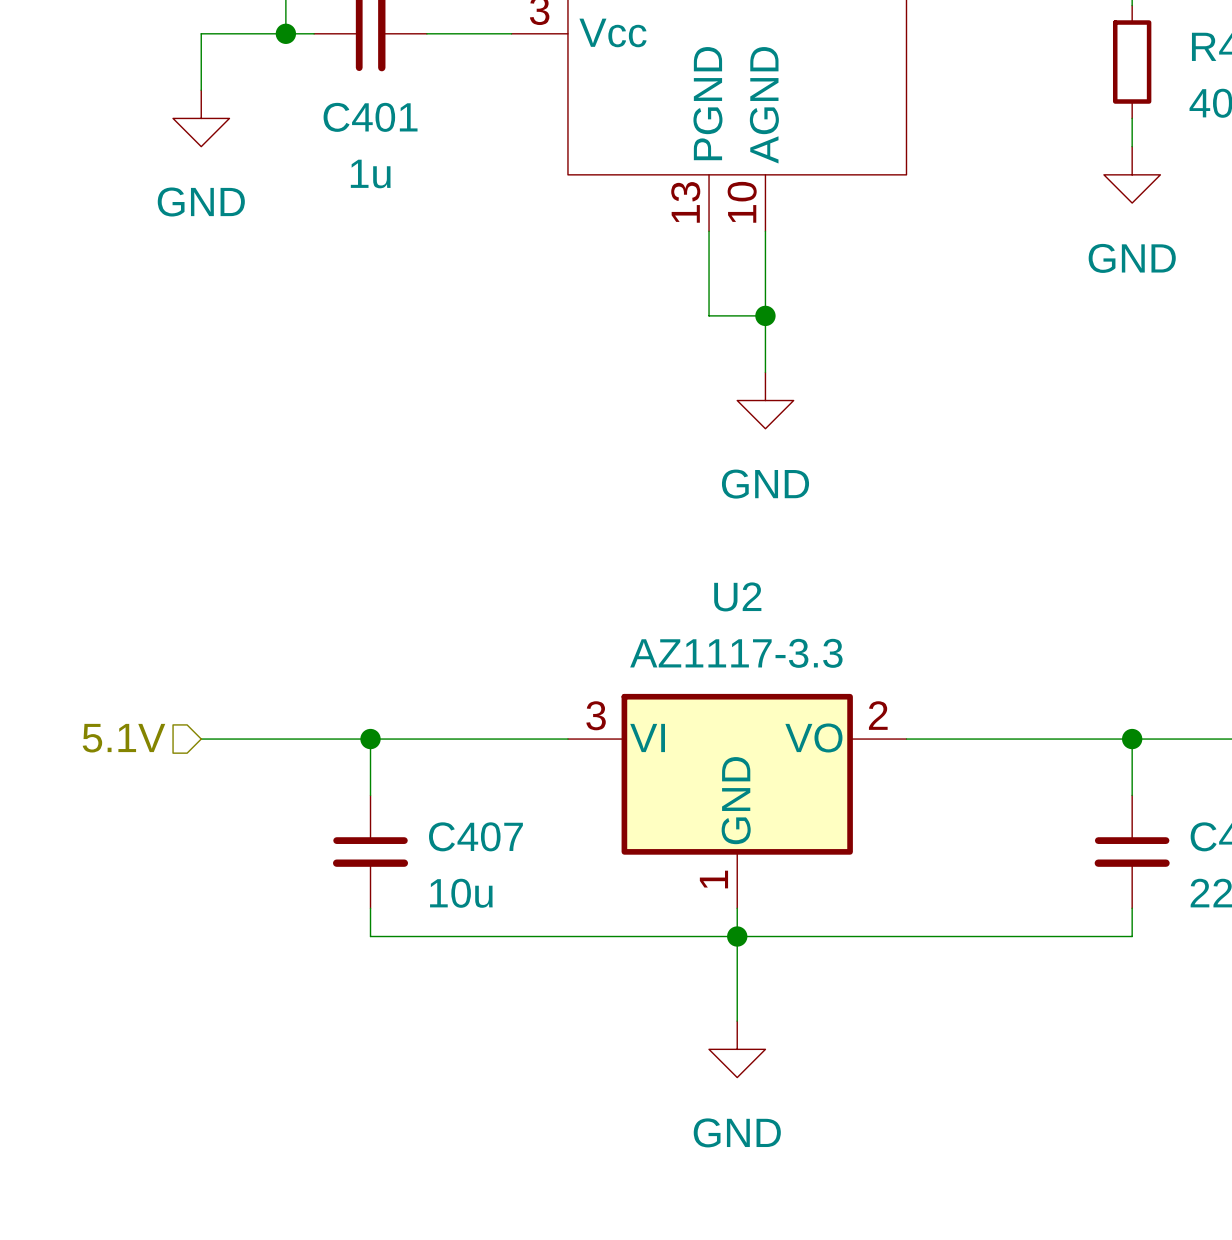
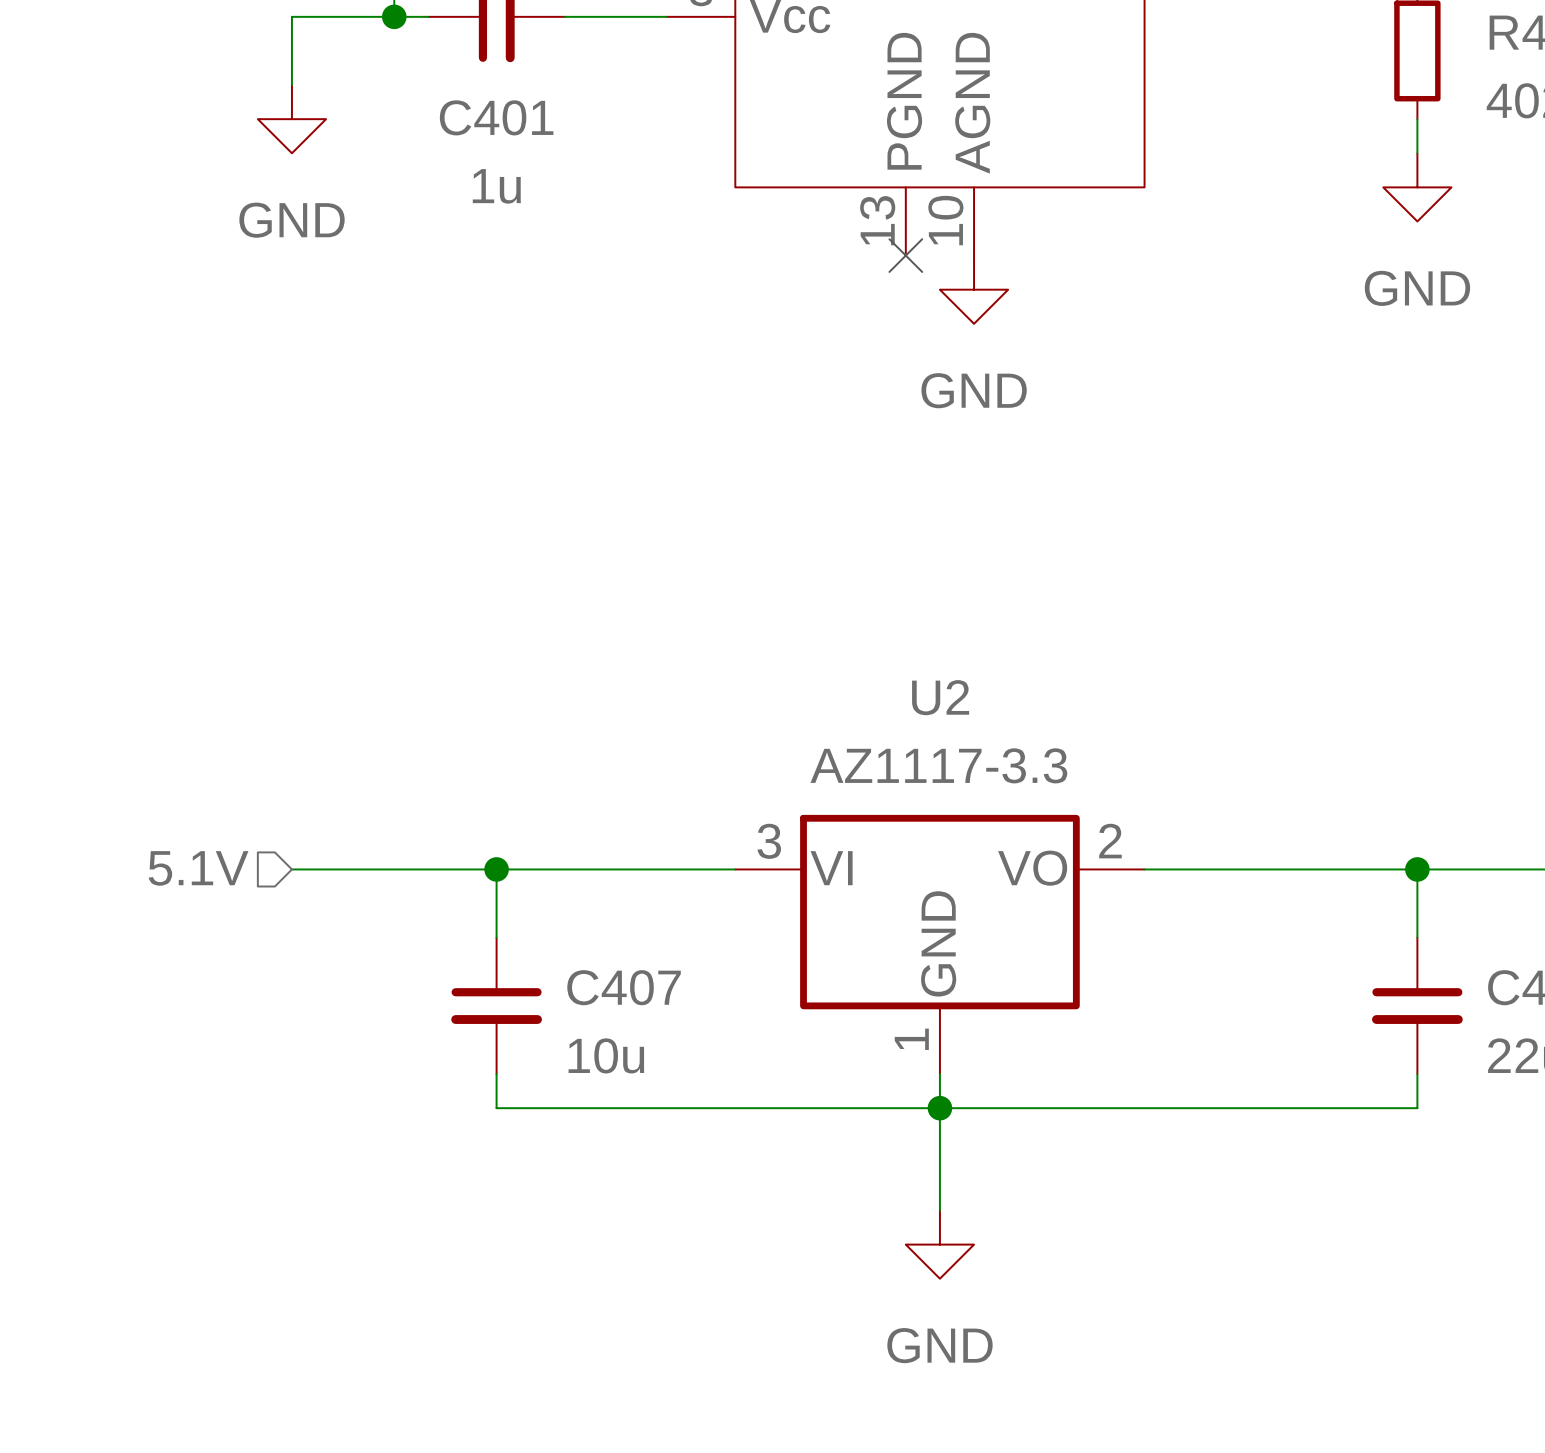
wire: (709, 231) (709, 315) (765, 315) -> none
no-connect mark: none -> (905, 255)
wire: (765, 231) (765, 372) -> none
junction: (765, 315) -> none
power symbol position: GND (765, 400) -> GND (974, 289)

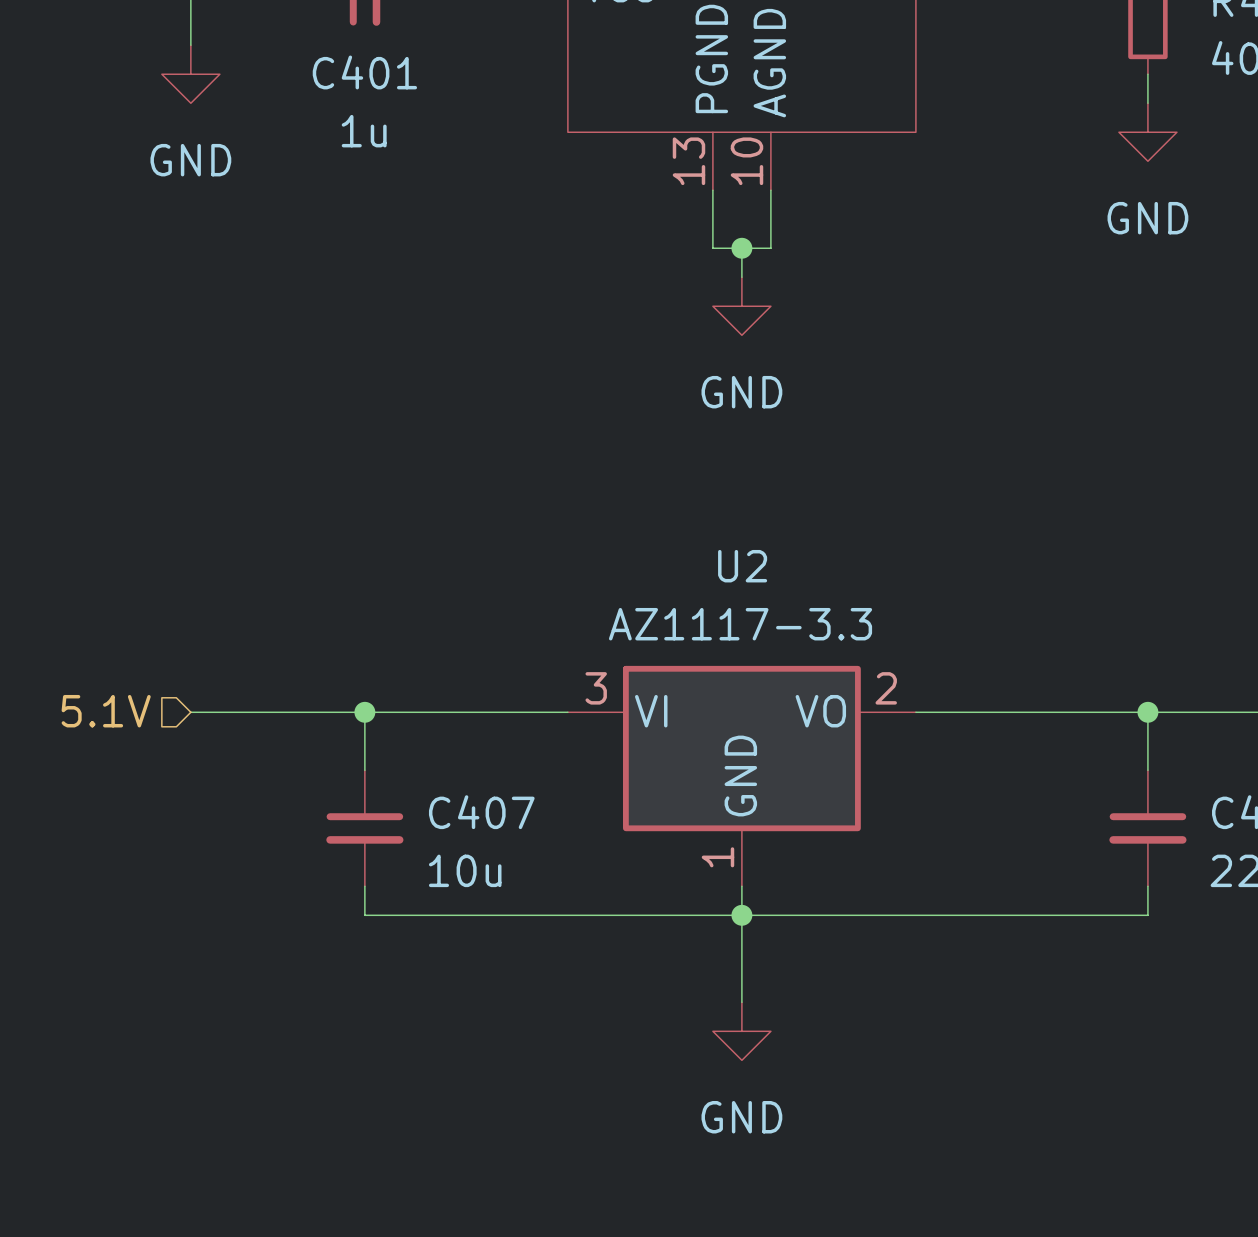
wire: none -> (712, 190) (712, 248) (770, 248) (770, 190)
no-connect mark: (905, 255) -> none
power symbol position: GND (974, 289) -> GND (741, 306)
wire: none -> (741, 248) (741, 277)
junction: none -> (741, 248)

